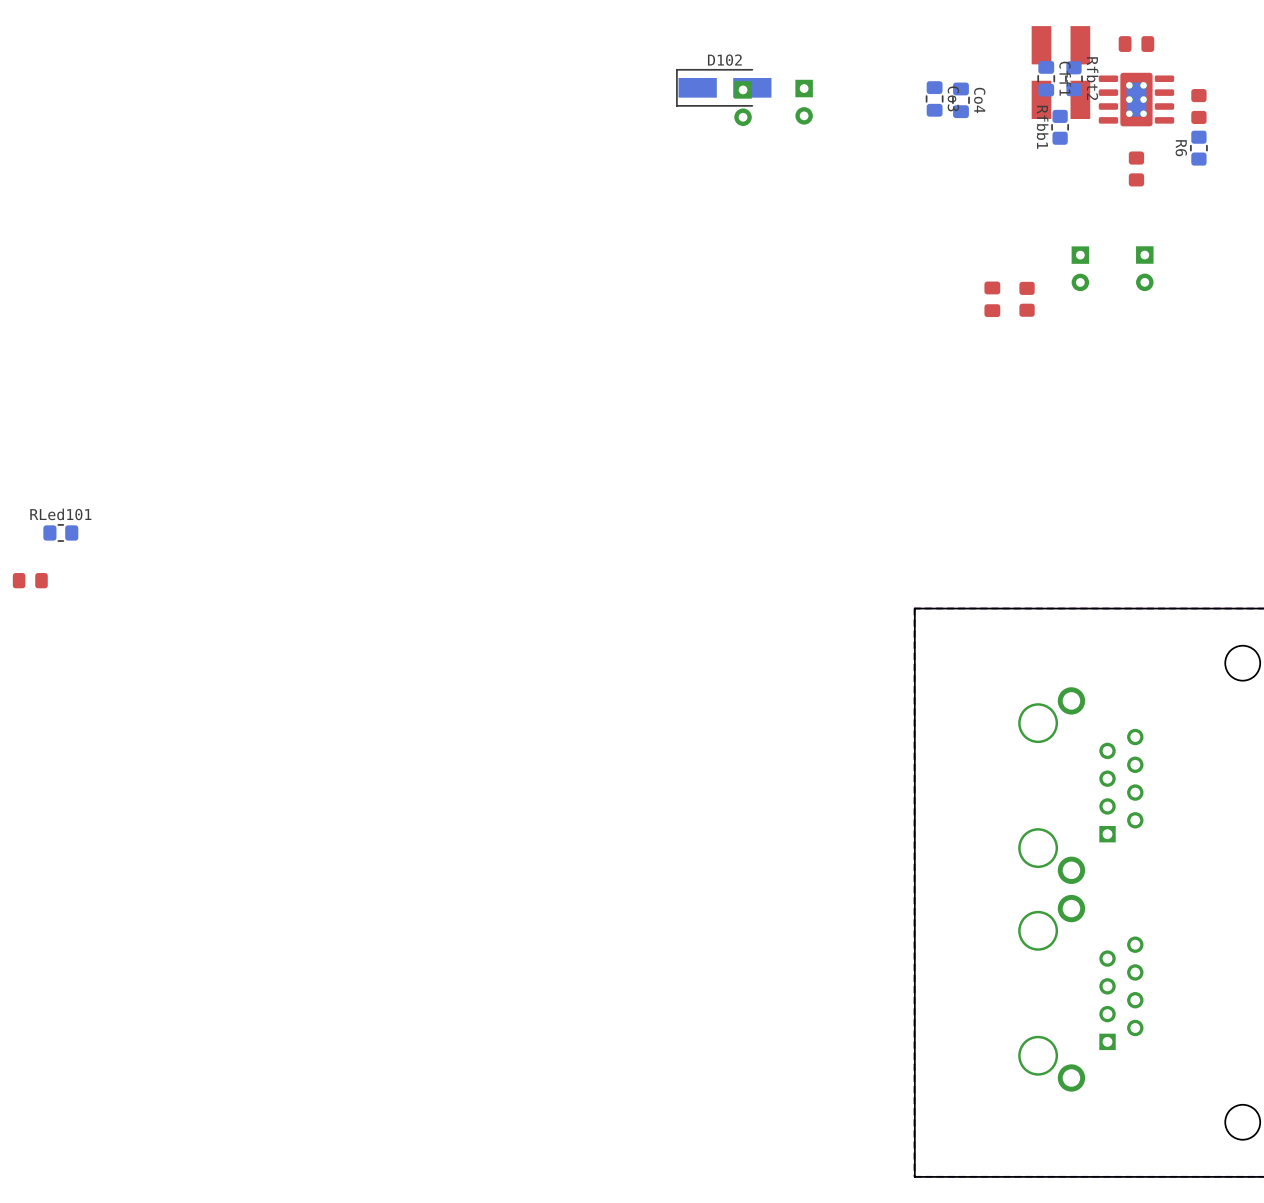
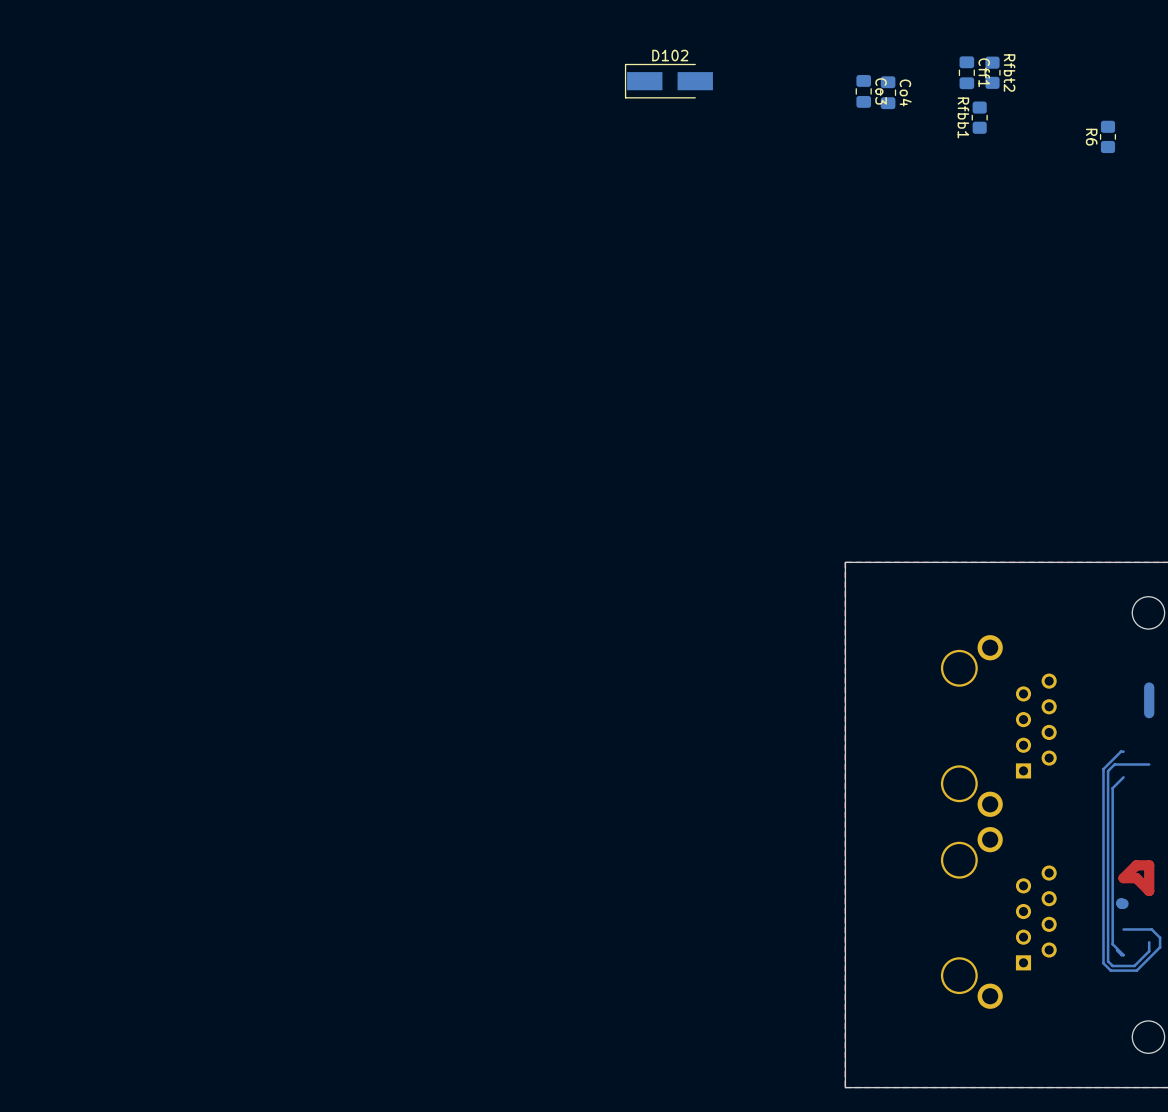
part: (1136, 44) -> none
part: (1041, 72) -> none
part: (1080, 72) -> none
part: (1136, 99) -> none
part: (804, 102) -> none
part: (743, 103) -> none
part: (1198, 106) -> none
part: (1136, 168) -> none
part: (1080, 268) -> none
part: (1144, 268) -> none
part: (992, 299) -> none
part: (1027, 299) -> none
RLed101: (60, 532) -> none
part: (30, 580) -> none
bottom track: none -> (1149, 687) (1149, 713)
bottom track: none -> (1123, 751) (1120, 751) (1103, 769) (1103, 963) (1110, 970) (1136, 970) (1160, 947) (1160, 937) (1151, 929) (1123, 929)
bottom track: none -> (1149, 764) (1114, 764) (1108, 771) (1108, 961) (1112, 966) (1134, 966) (1149, 951) (1149, 942)
bottom track: none -> (1123, 777) (1112, 788) (1112, 944) (1123, 955) (1117, 950)
top track: none -> (1149, 865) (1136, 865) (1123, 878) (1136, 878) (1149, 890) (1149, 865)
bottom track: none -> (1121, 903) (1123, 903)

